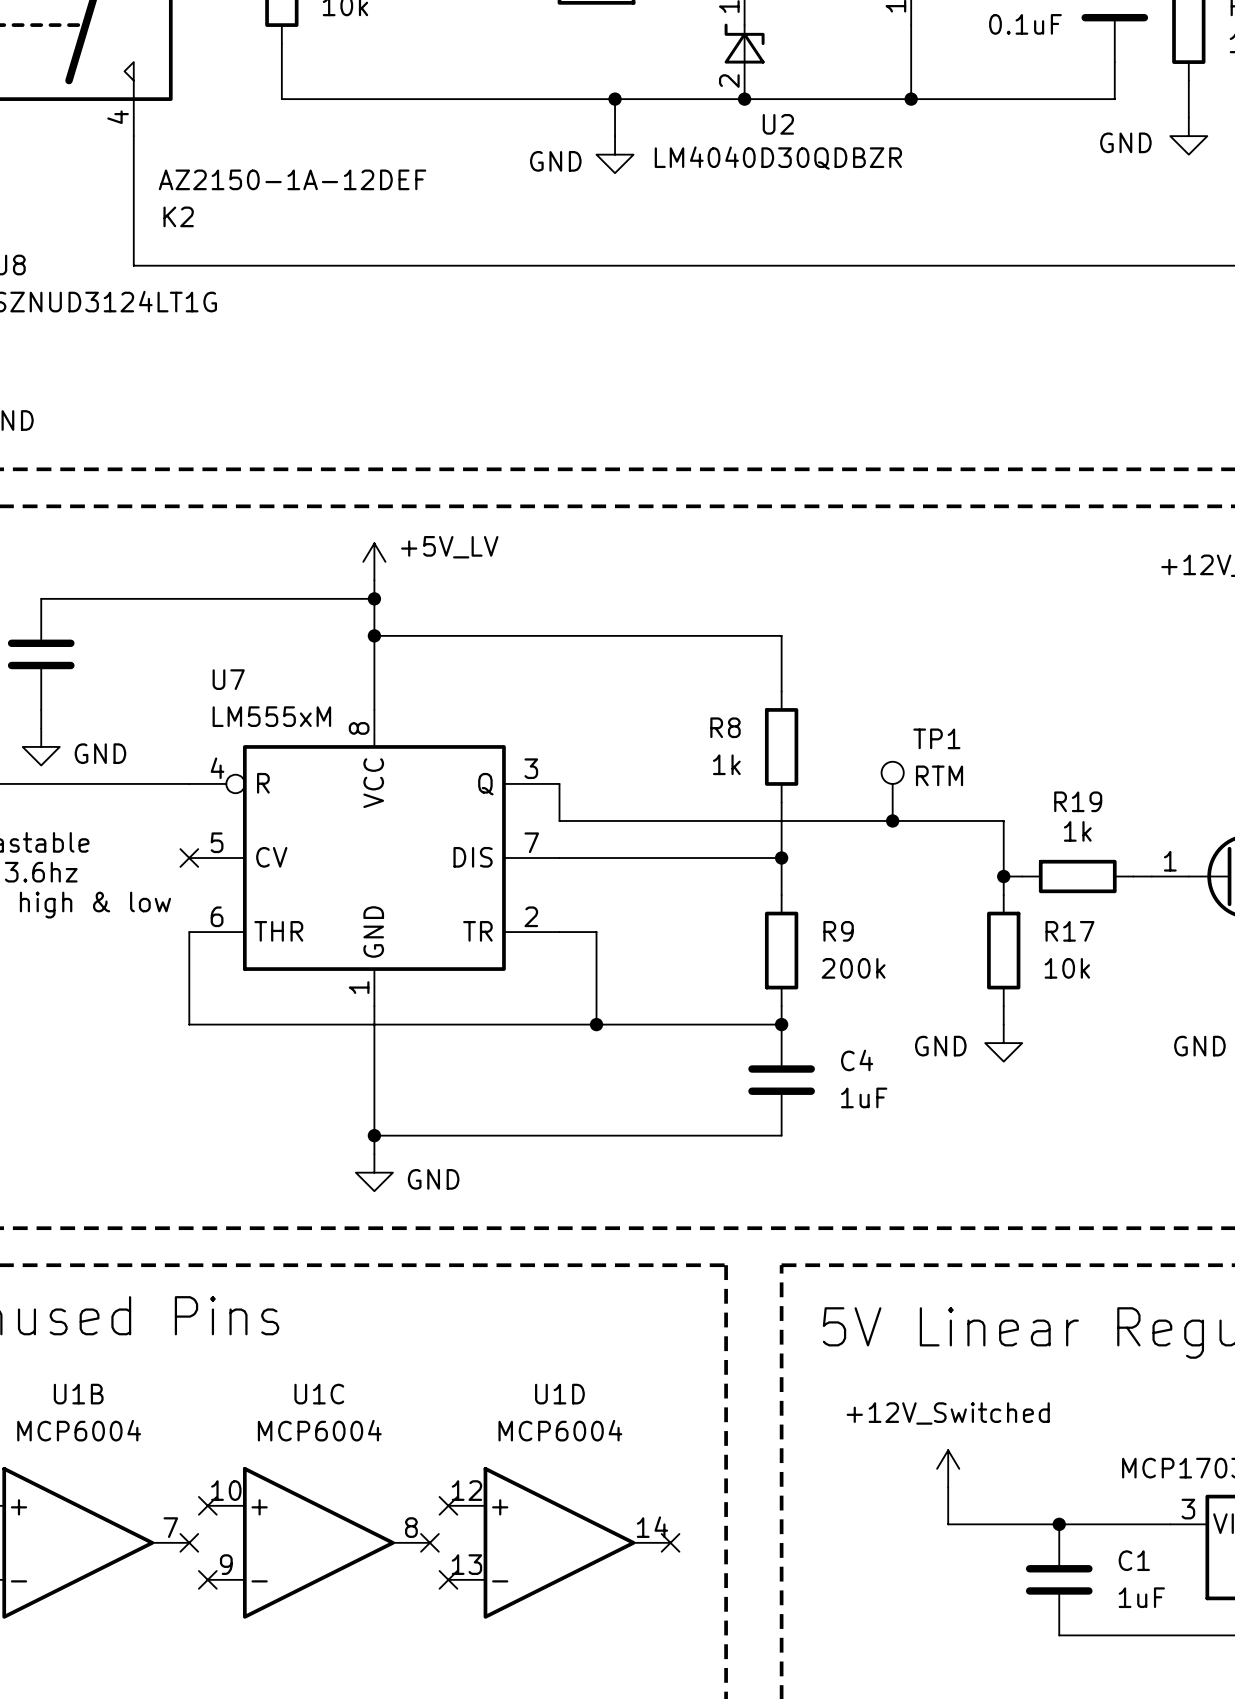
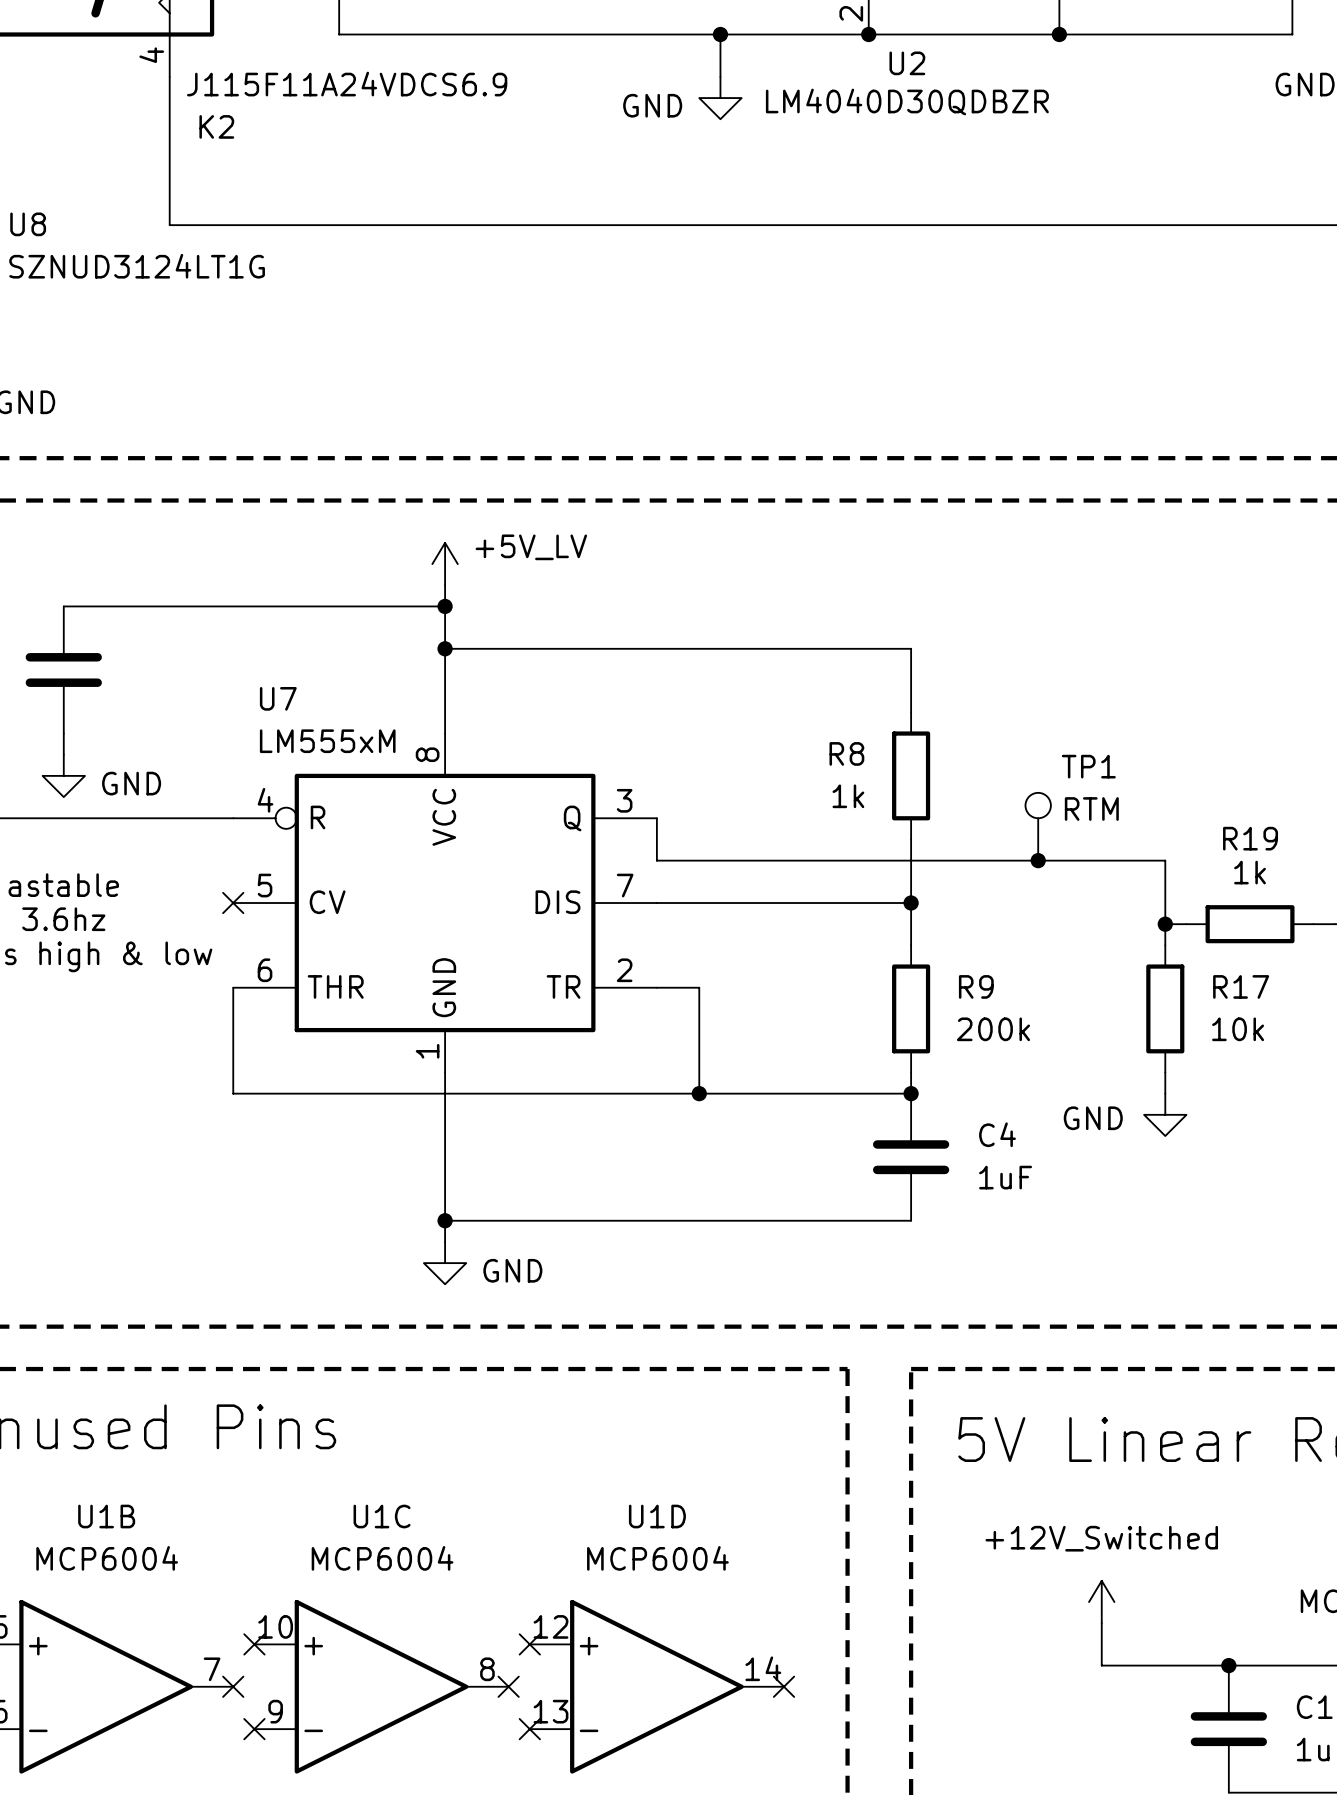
K2 value: AZ2150-1A-12DEF (292, 179) -> J115F11A24VDCS6.9 (347, 84)
K2 name position: K2 (178, 216) -> K2 (216, 126)

